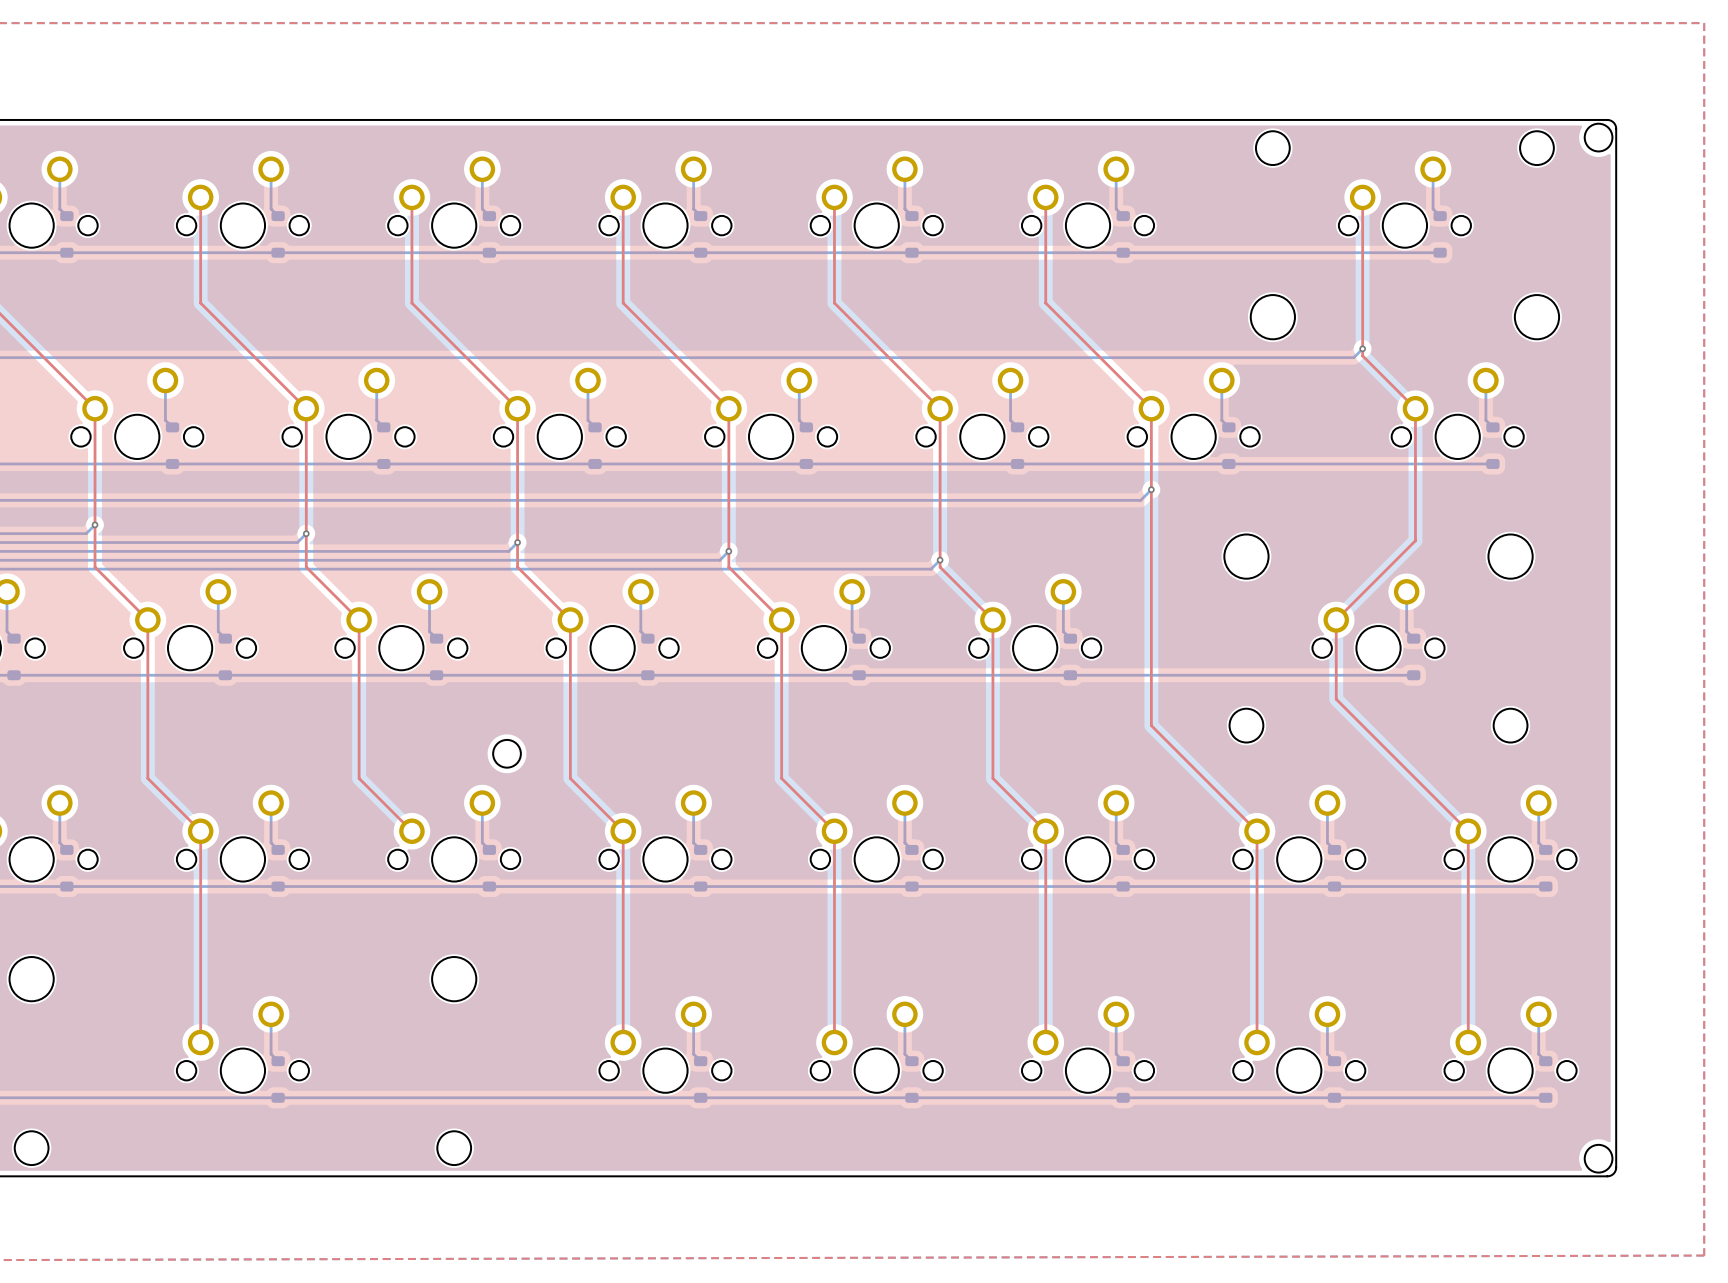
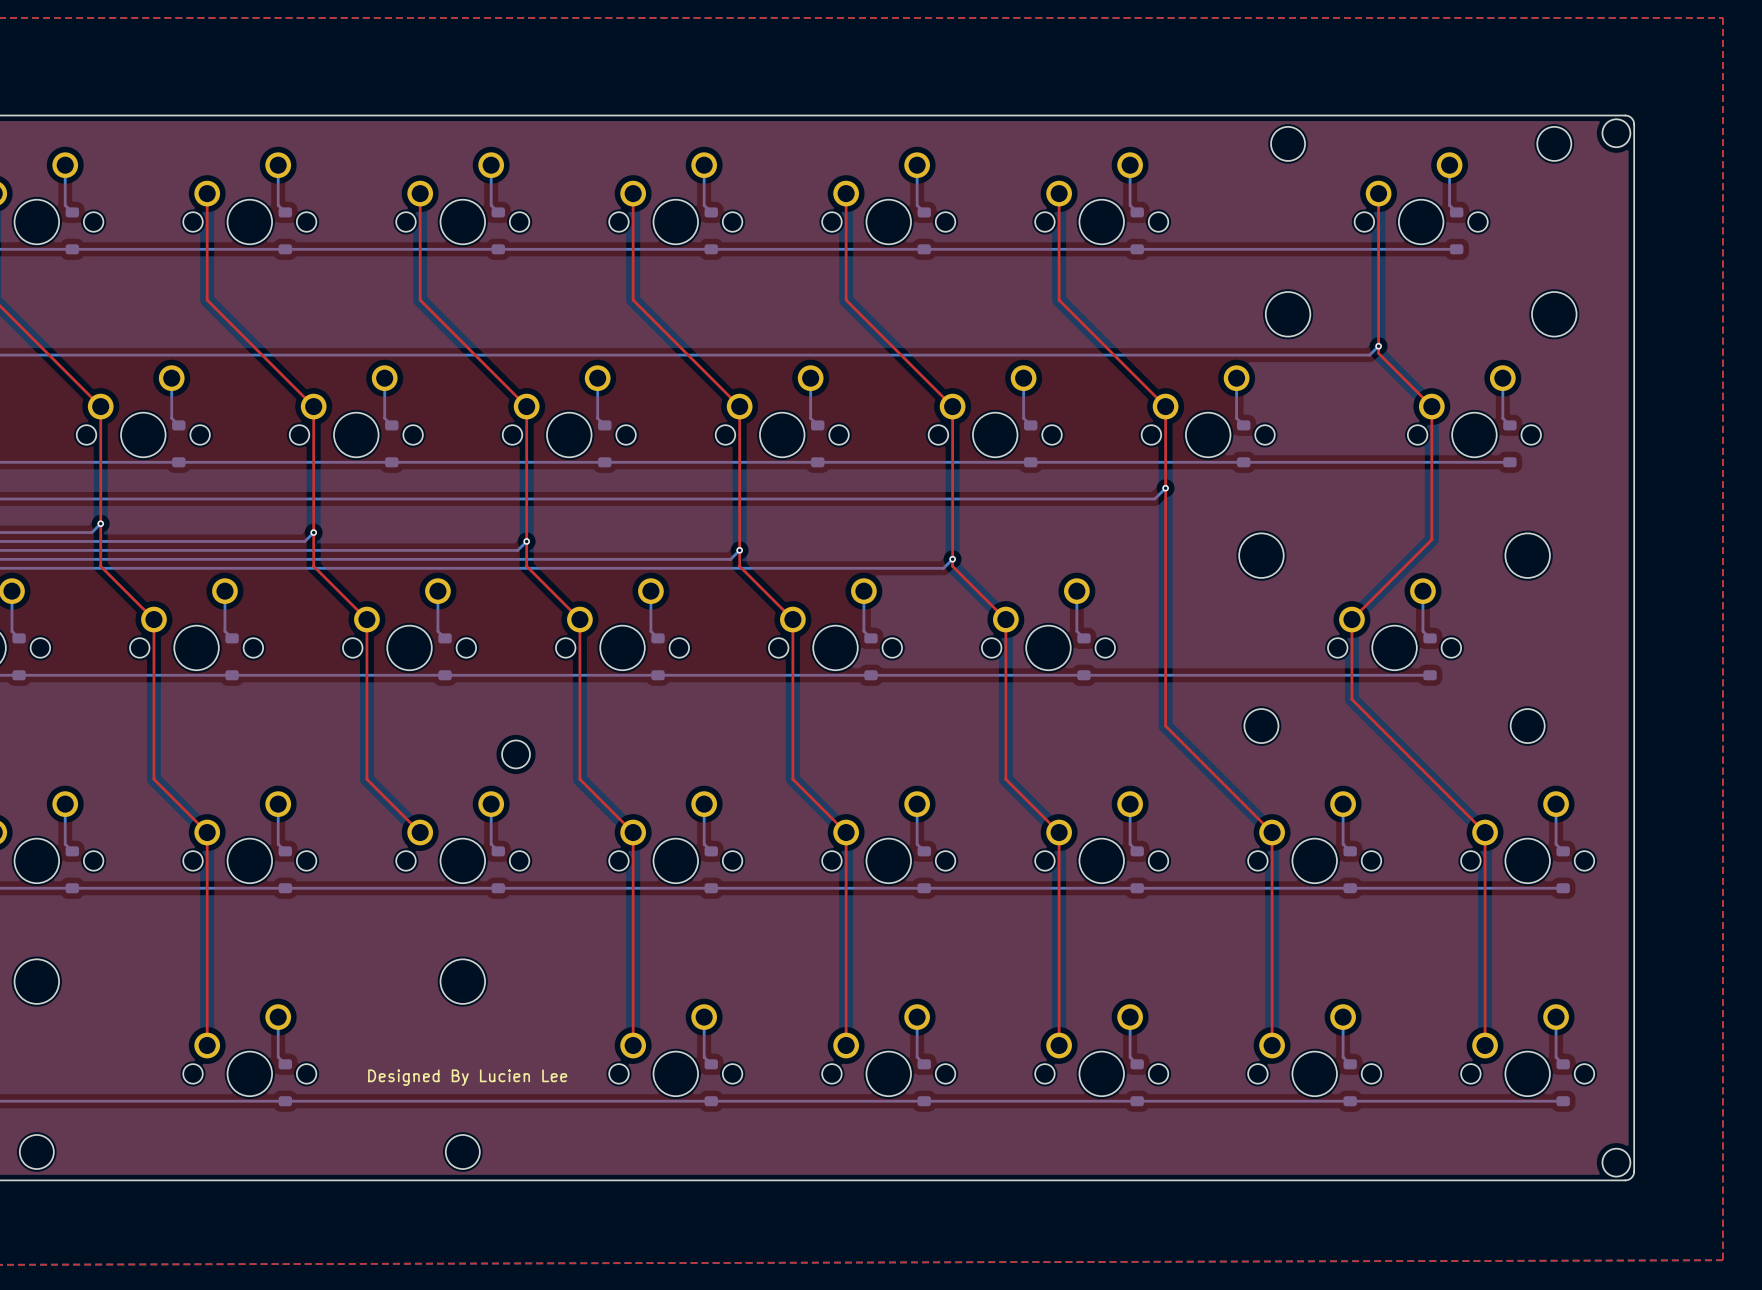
text: none -> Designed By Lucien Lee (467, 1077)

